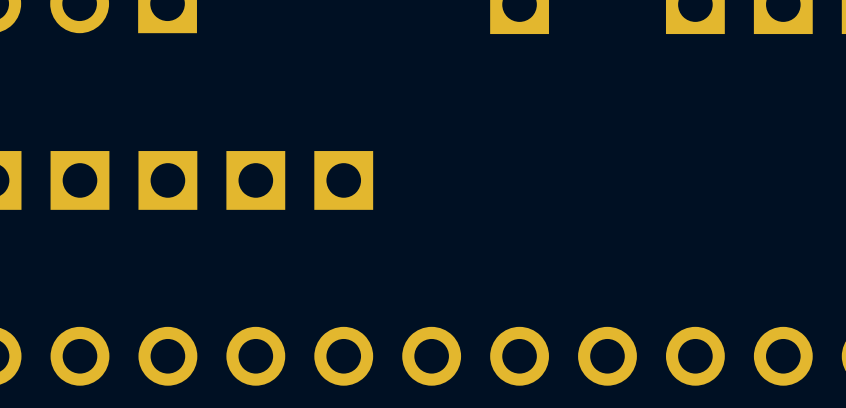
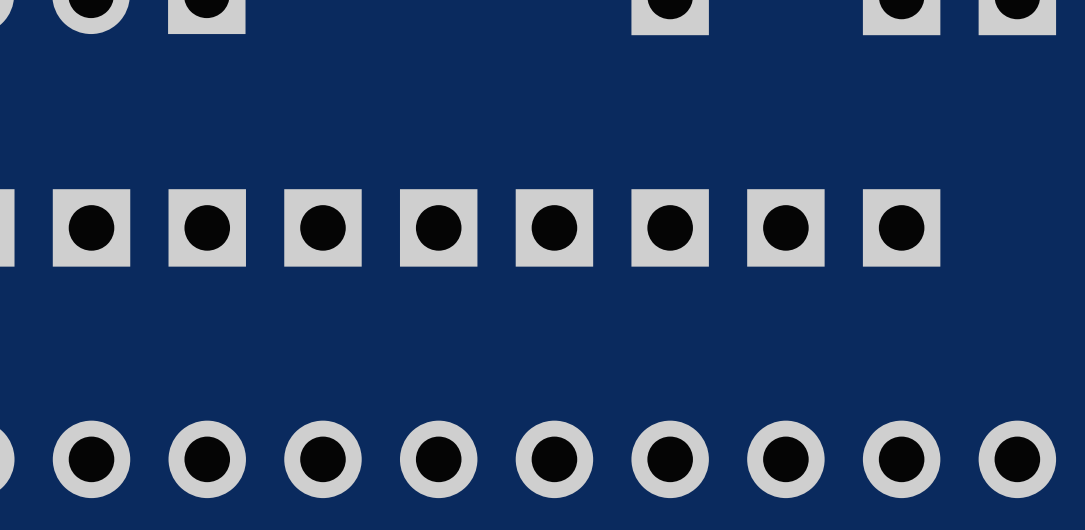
part: none -> (554, 227)
part: none -> (670, 227)
part: none -> (785, 227)
part: none -> (901, 227)

